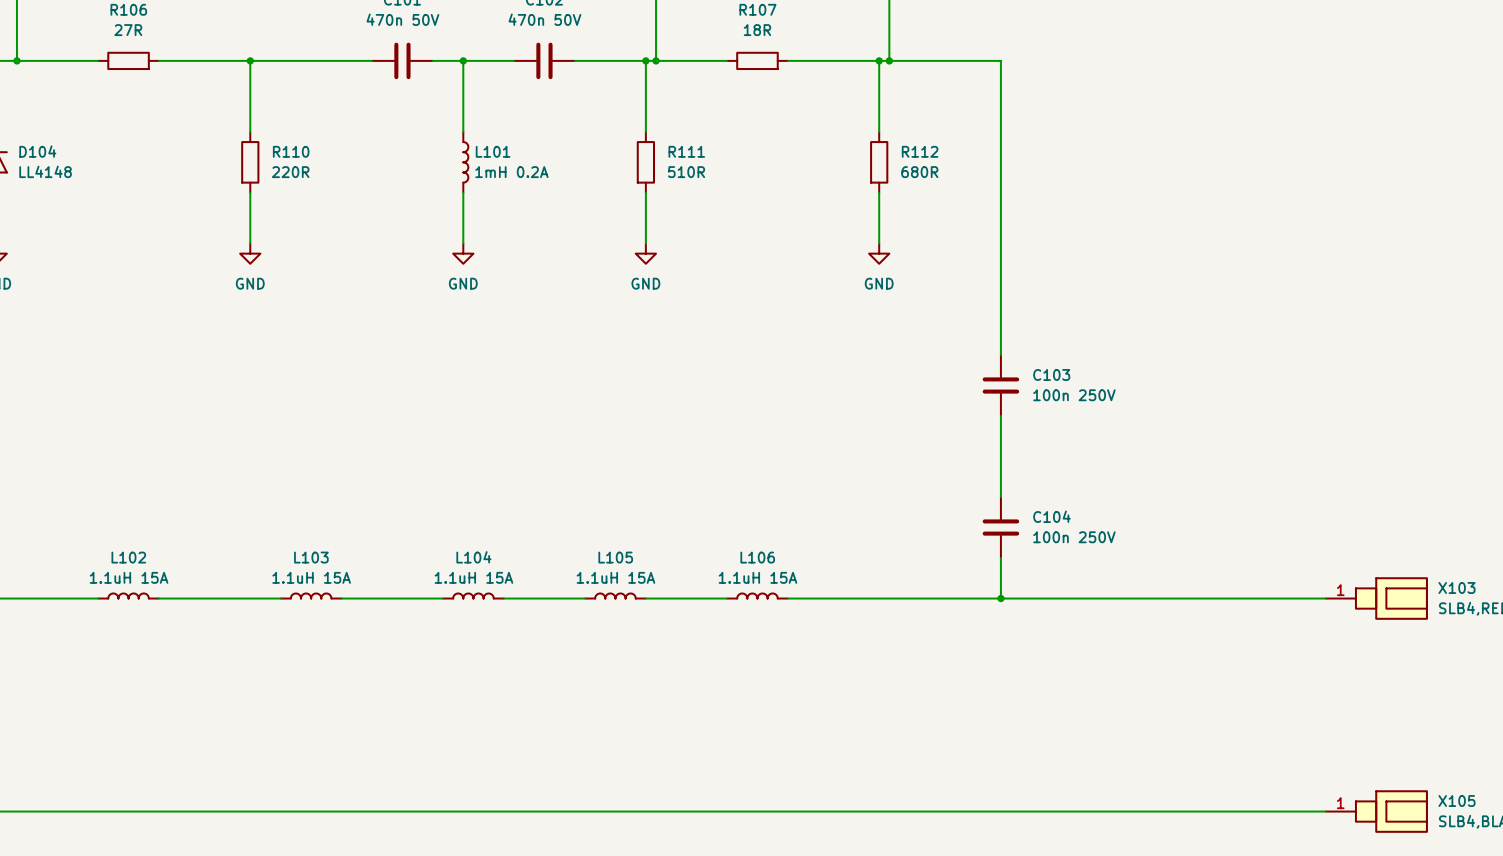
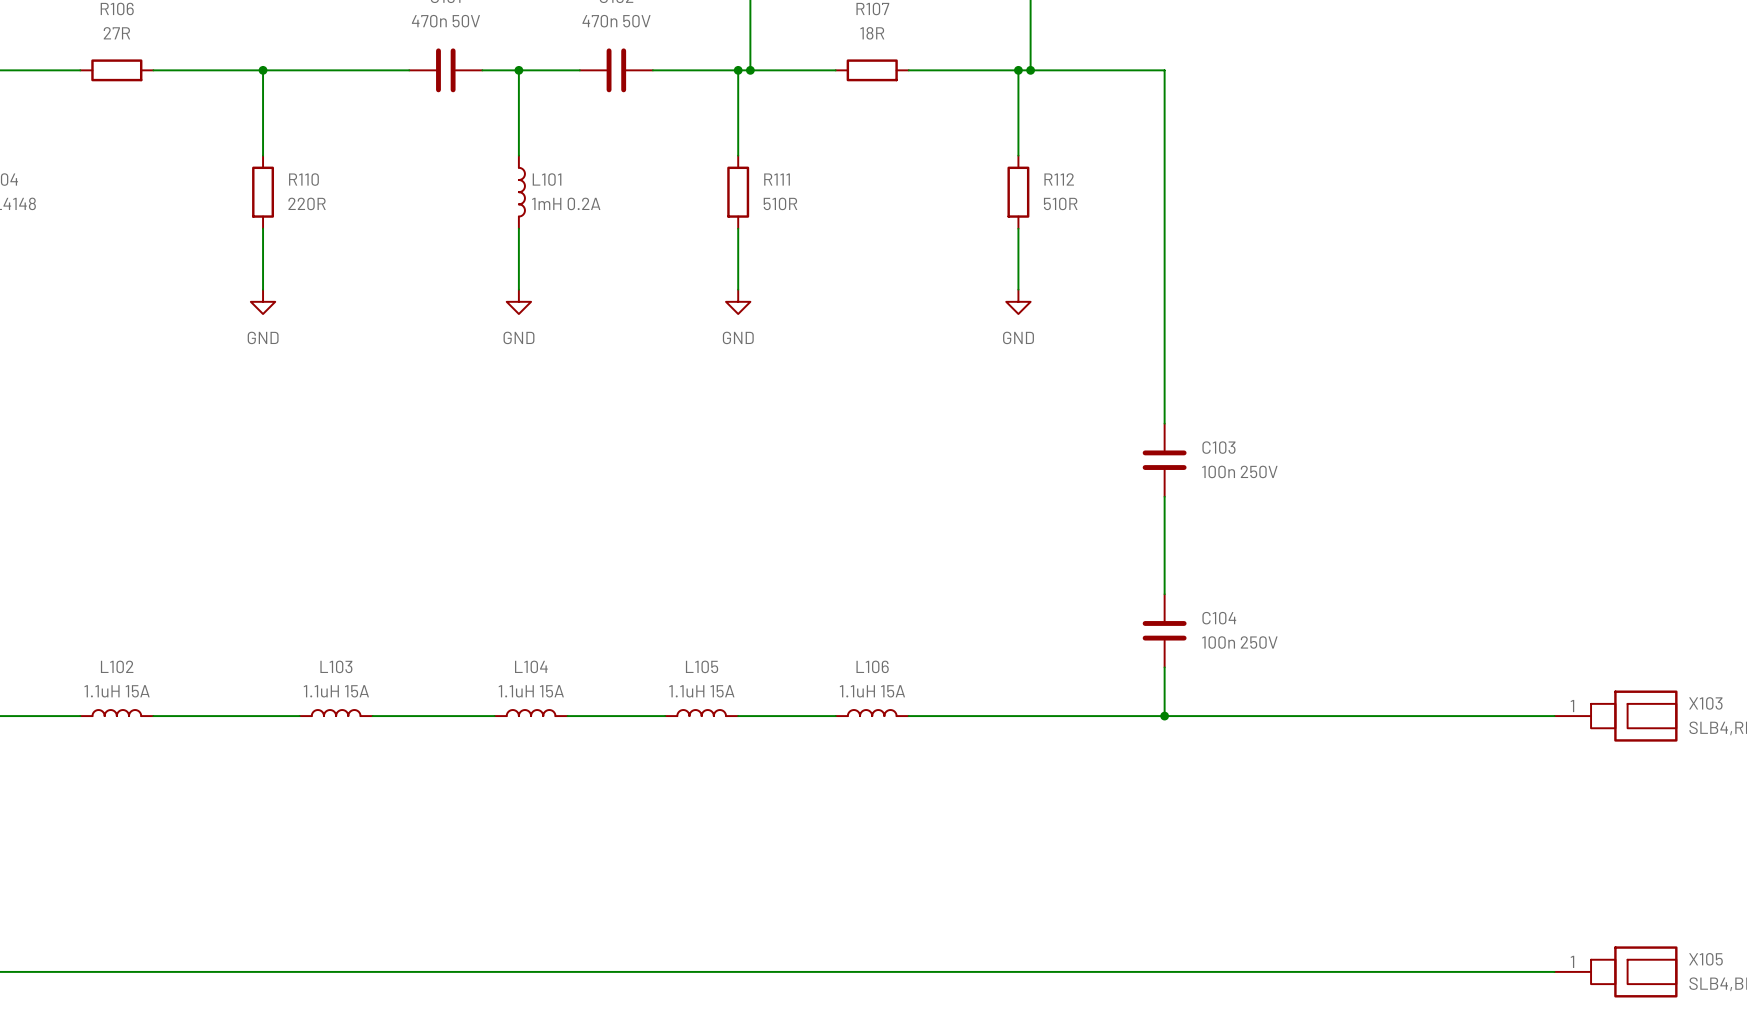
R112 value: 680R (919, 172) -> 510R (1060, 203)

